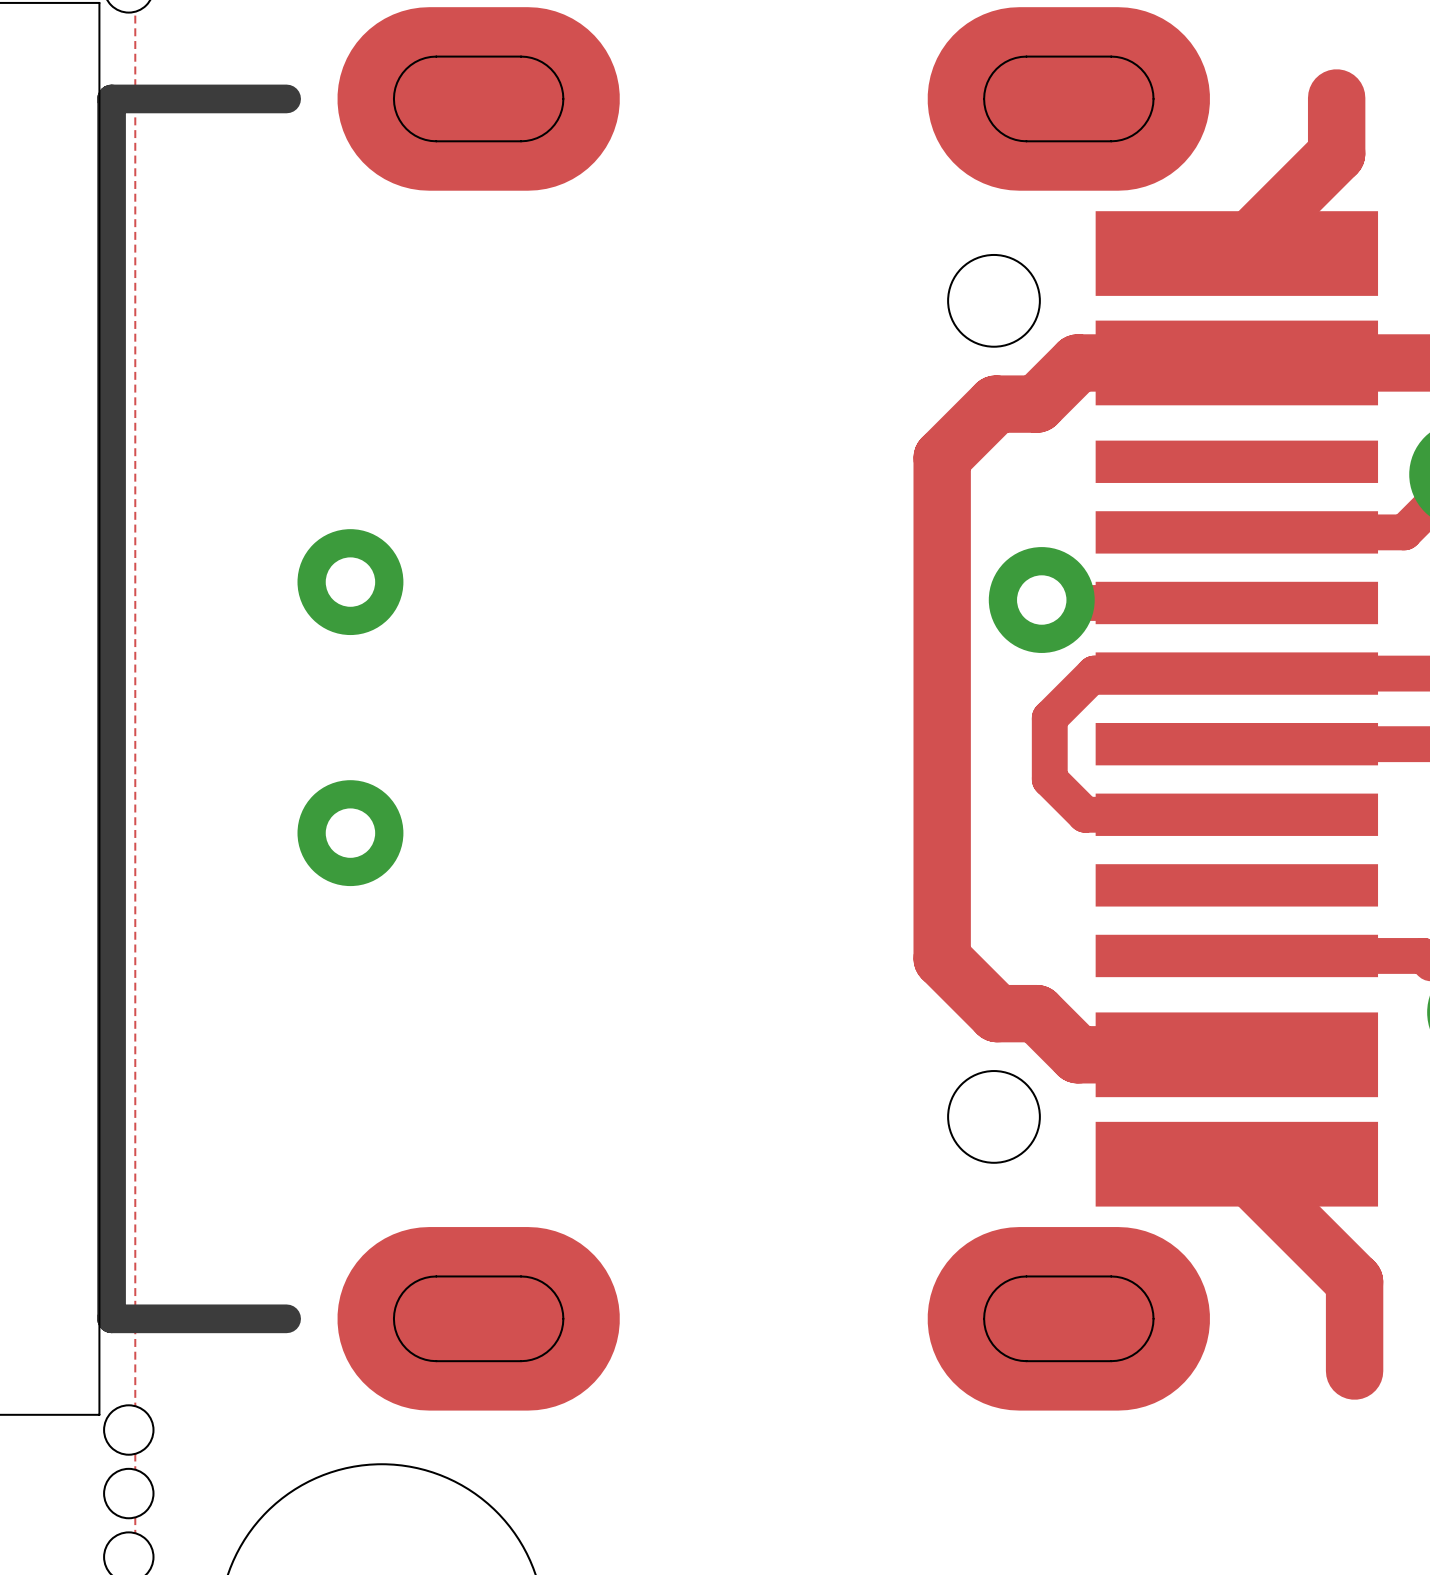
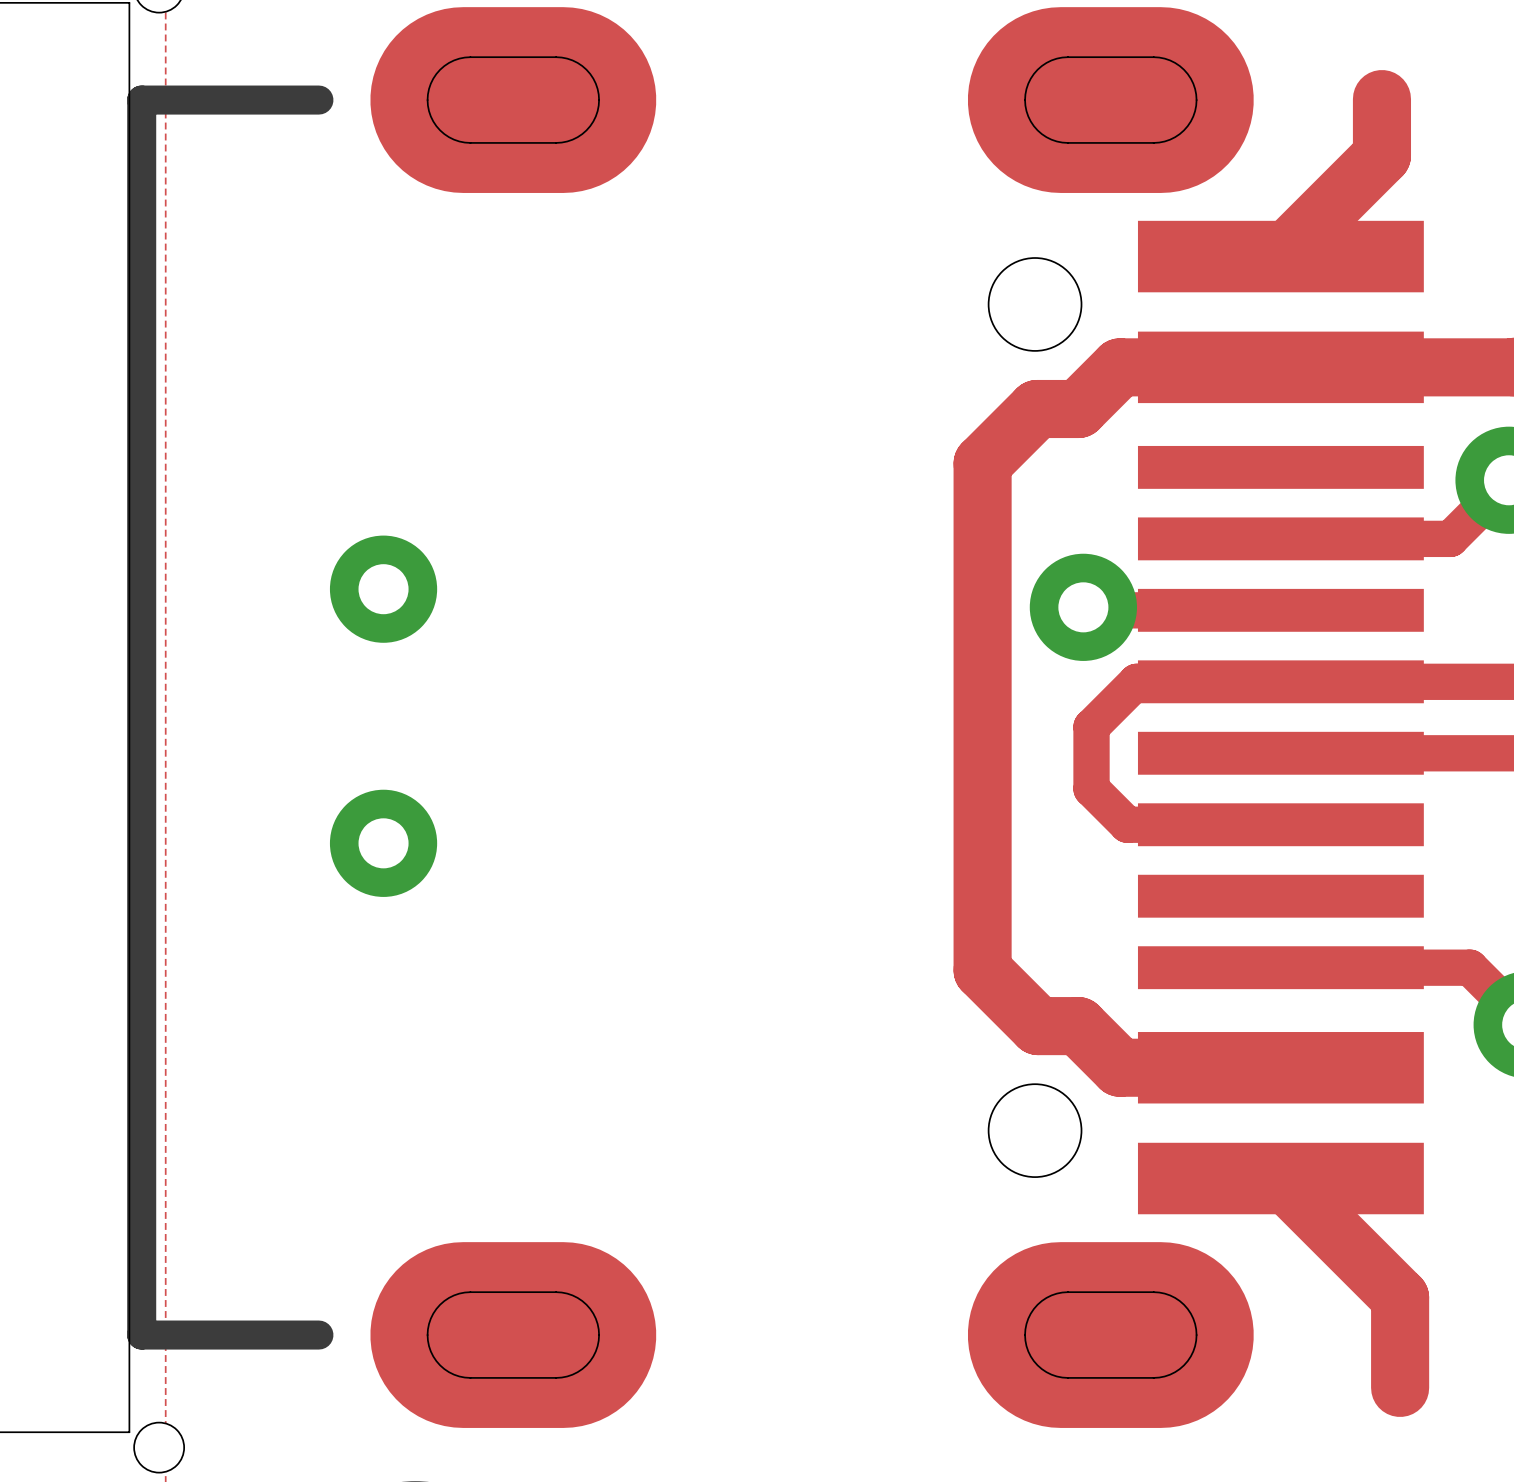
part footprint: [97, 7, 1379, 1411] -> [127, 7, 1424, 1428]

